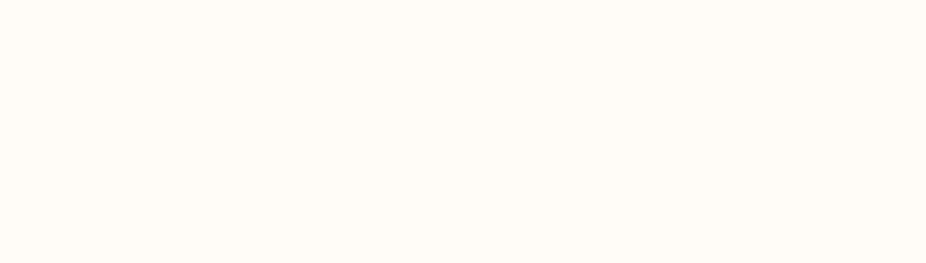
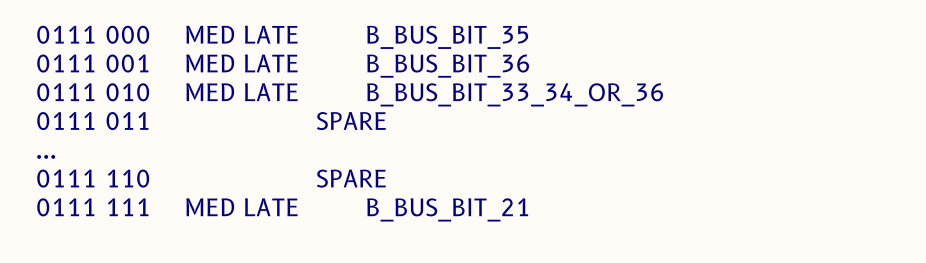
text: none -> 0111 000 MED LATE B_BUS_BIT_35 (282, 37)
text: none -> 0111 001 MED LATE B_BUS_BIT_36 (283, 66)
text: none -> 0111 010 MED LATE B_BUS_BIT_33_34_OR_36 (350, 94)
text: none -> 0111 011 SPARE (211, 121)
text: none -> ... (46, 156)
text: none -> 0111 110 SPARE (211, 178)
text: none -> 0111 111 MED LATE B_BUS_BIT_21 (282, 209)

